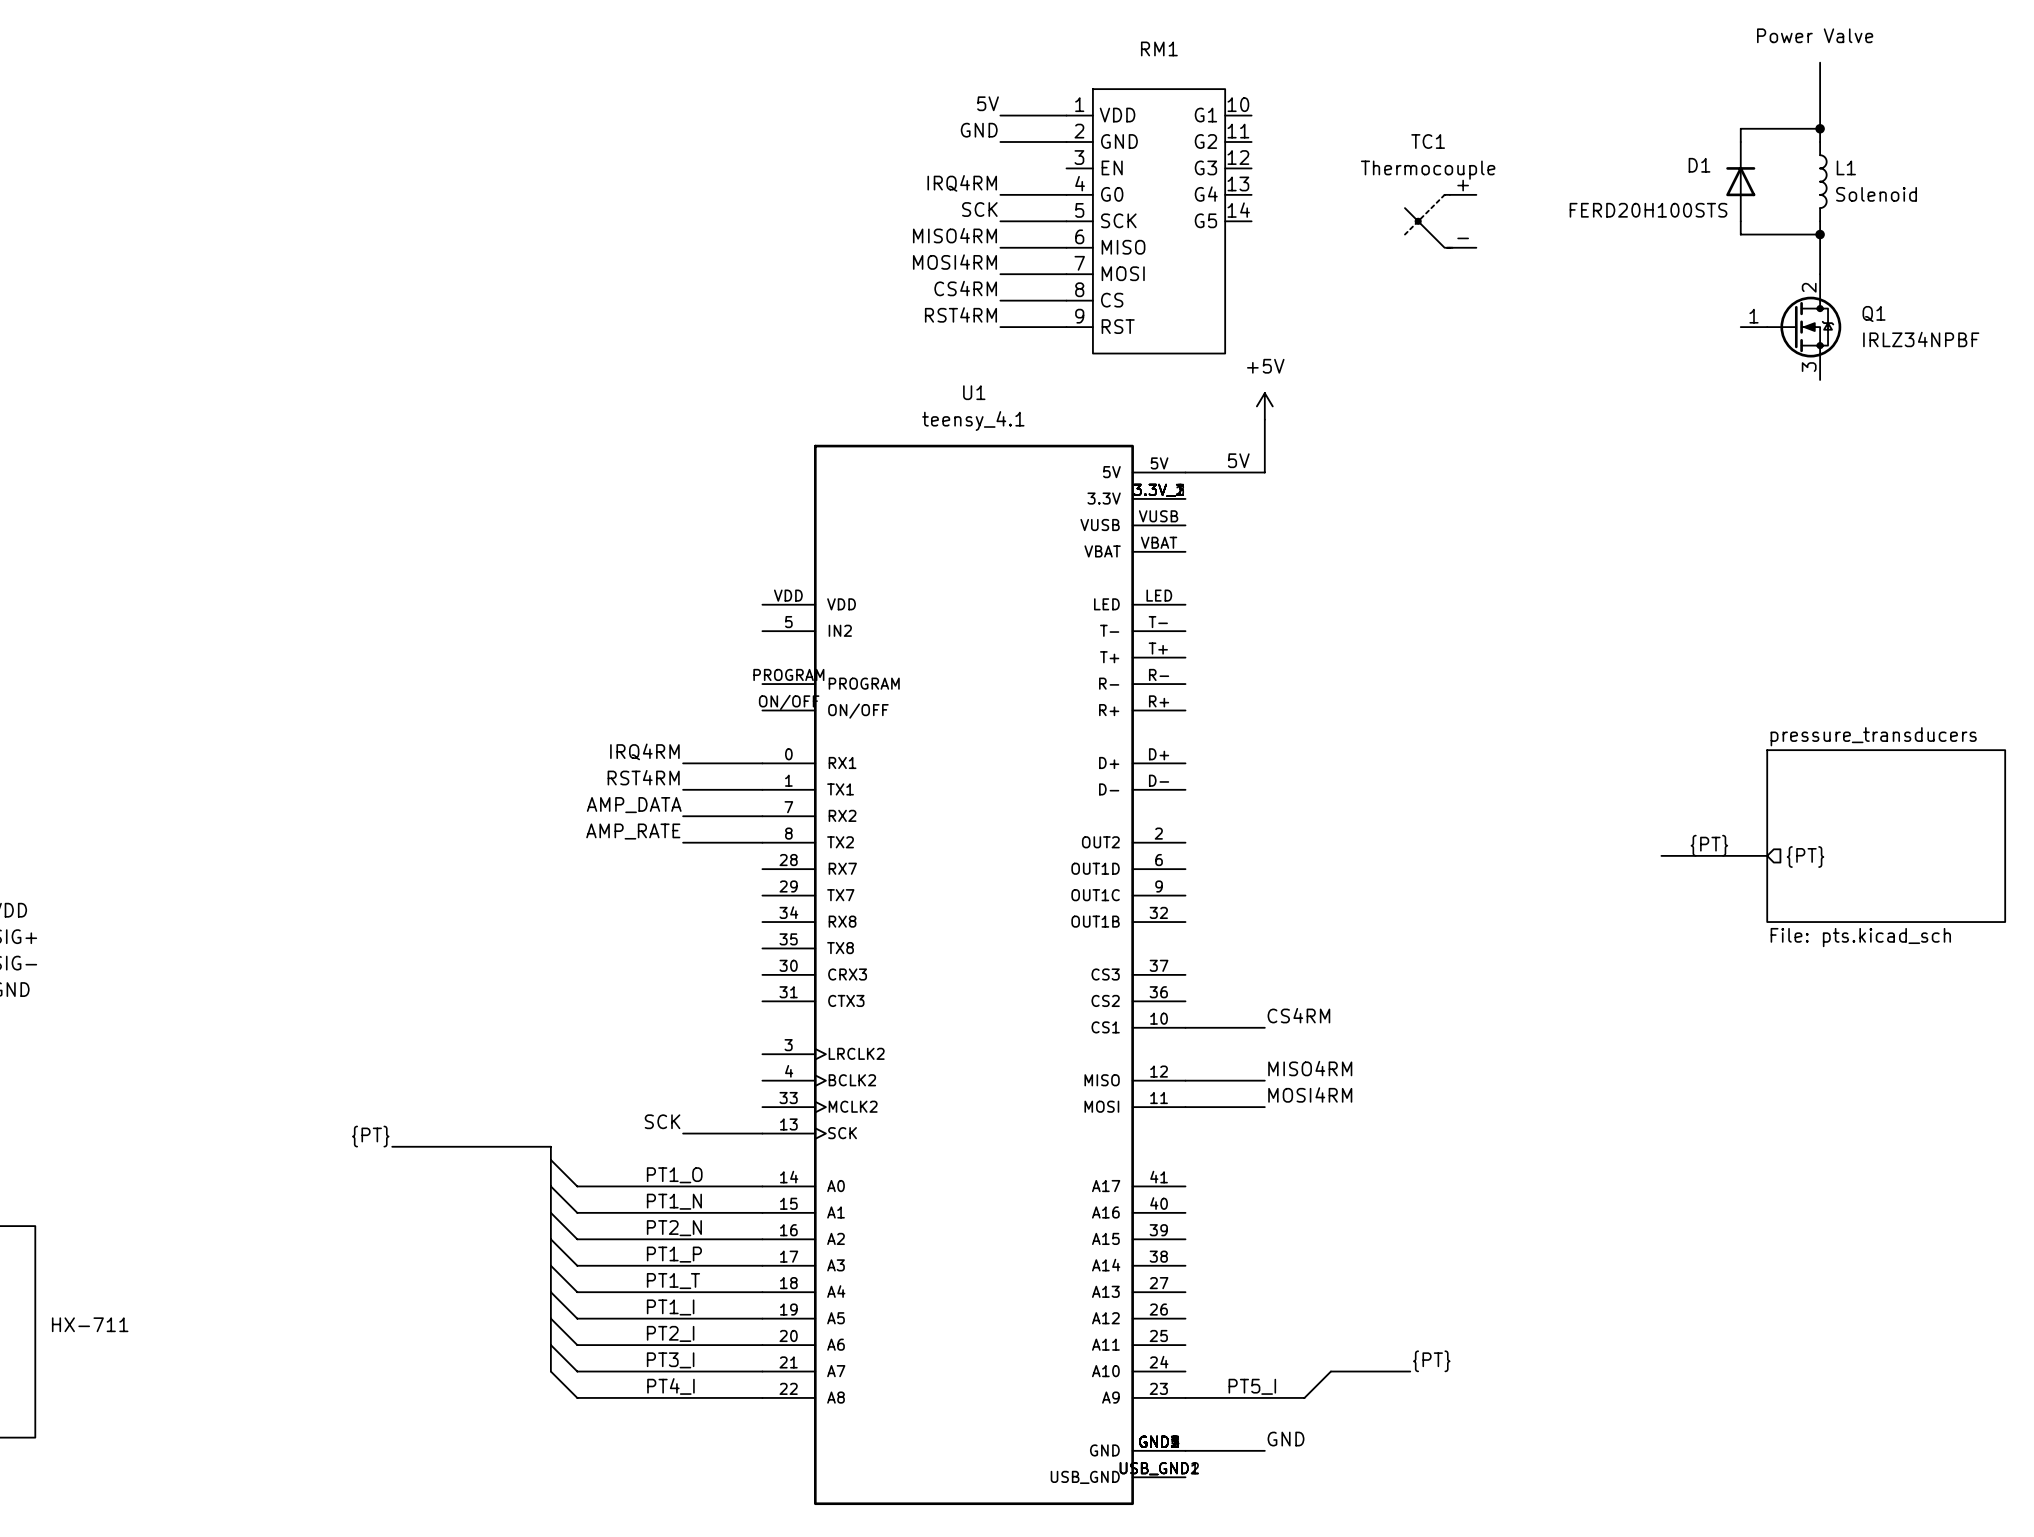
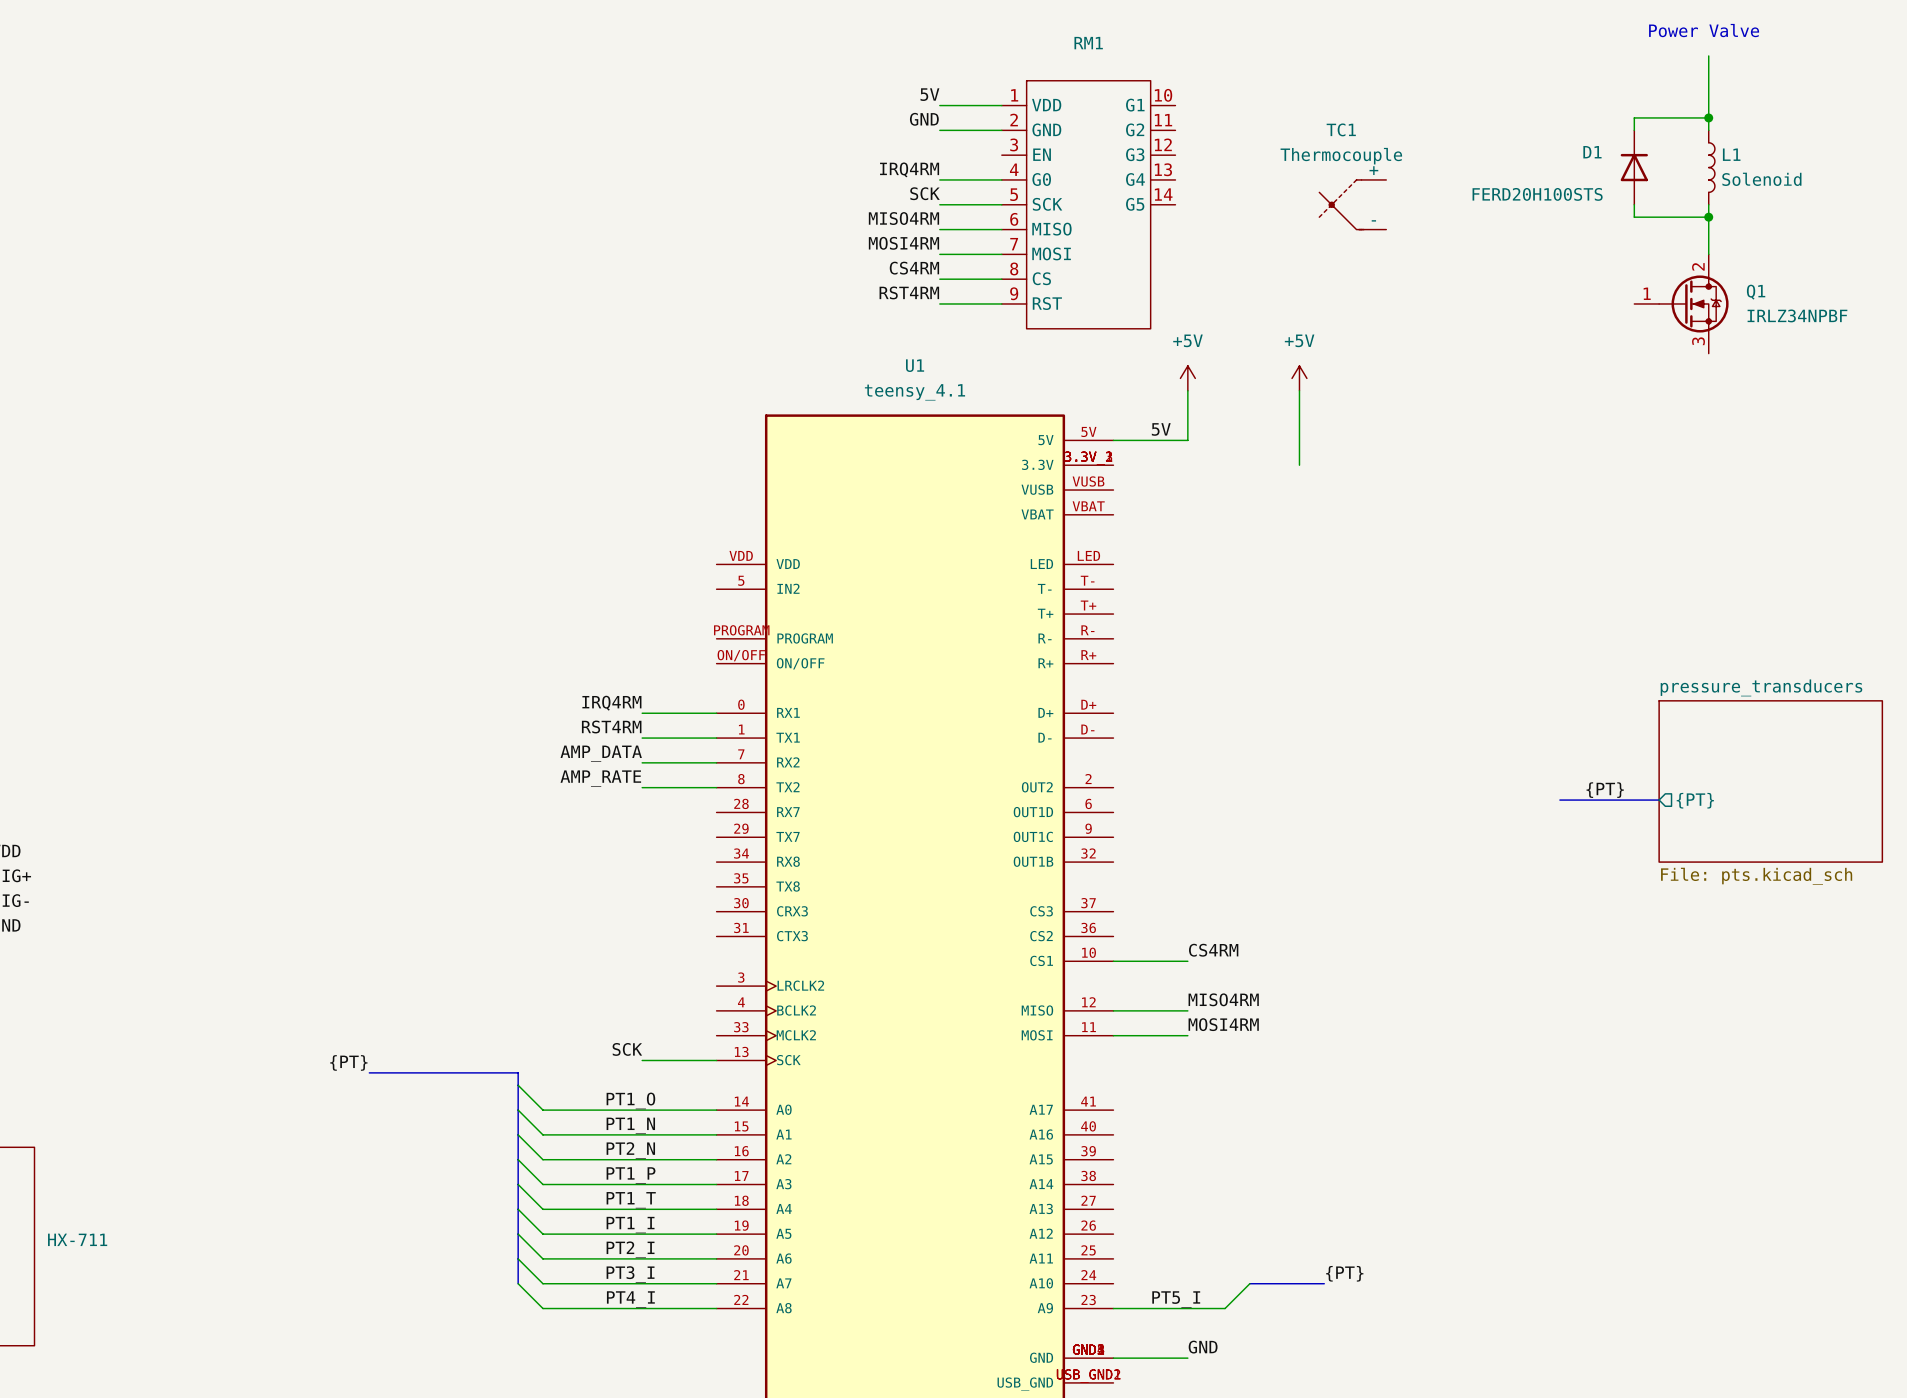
power symbol: none -> +5V (1299, 378)
wire: none -> (1299, 390) (1299, 465)

